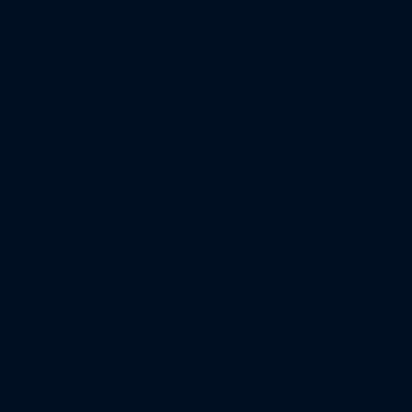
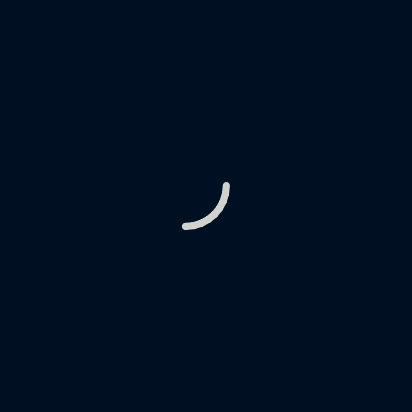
board edge: none -> (226, 185) (223, 201) (214, 214) (201, 223) (185, 226)

